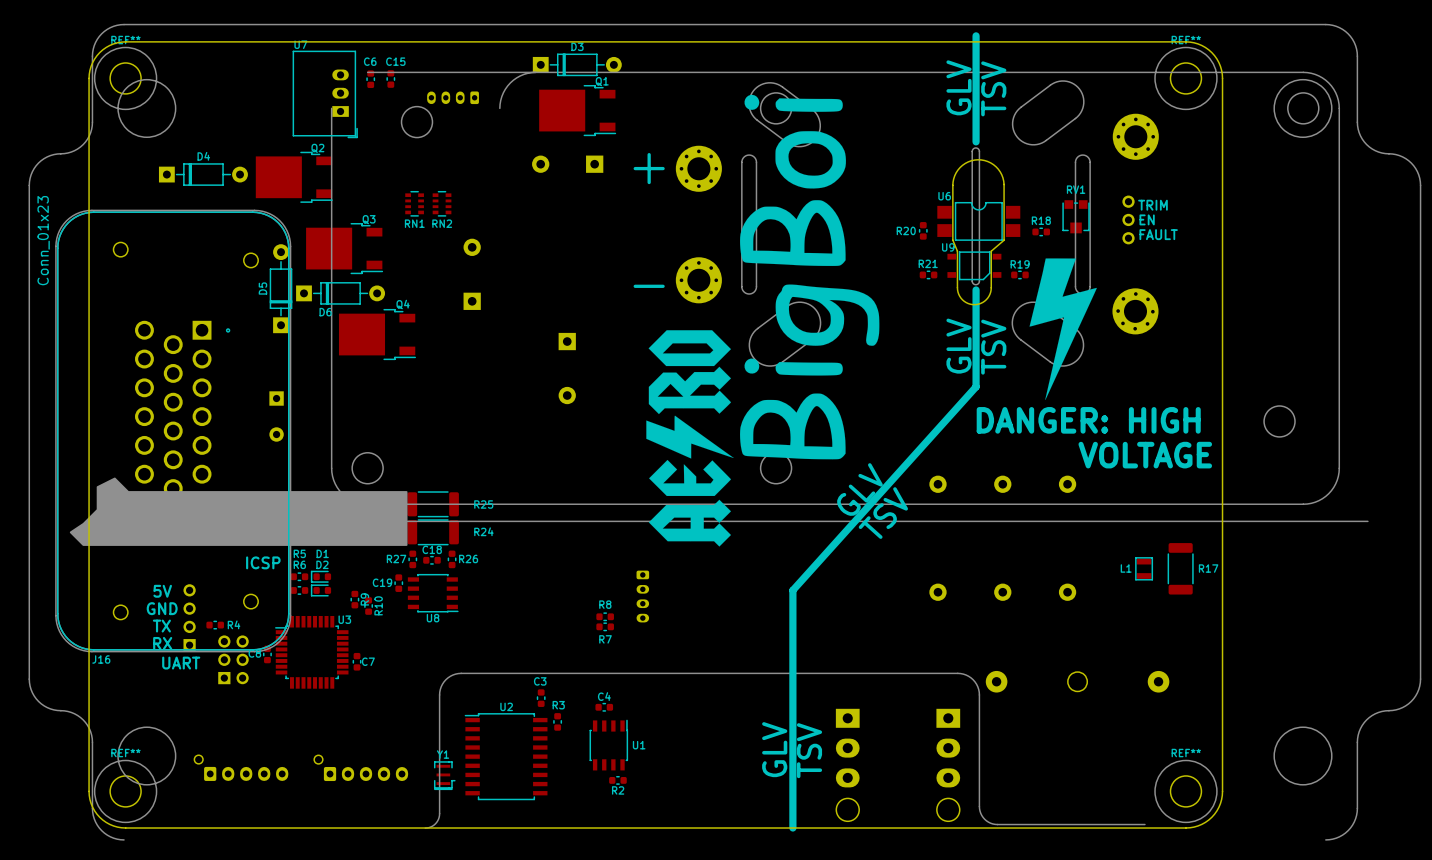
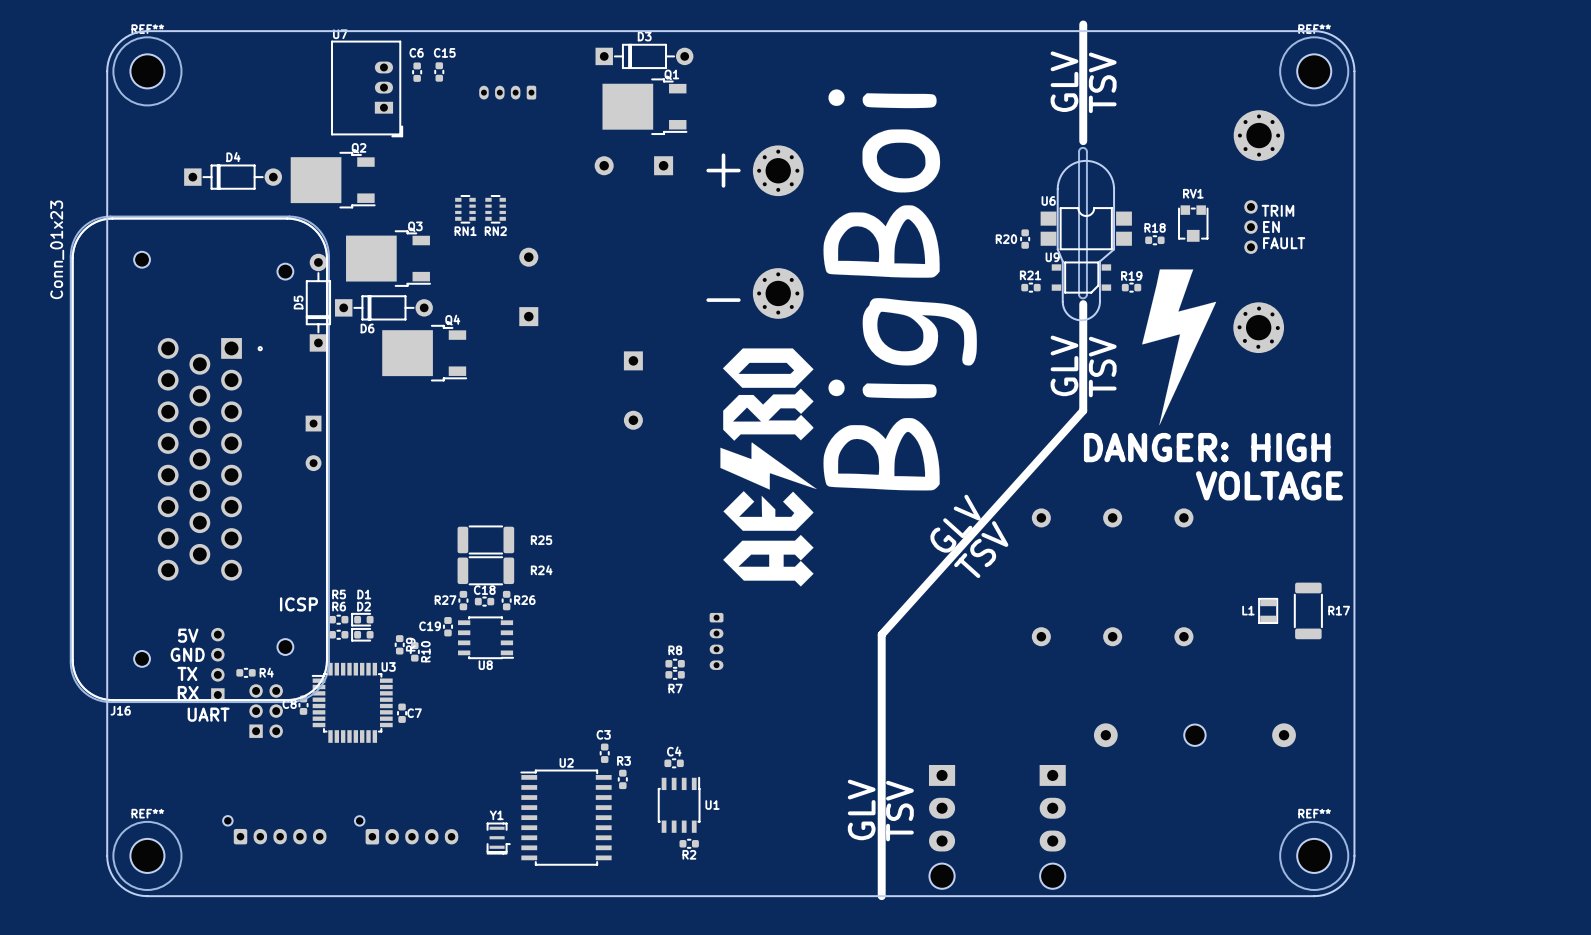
line: (367, 72) (1303, 72) (1318, 75) (1333, 89) (1339, 108) (1339, 468) (1335, 483) (1322, 498) (1303, 504) (367, 504) (355, 502) (339, 490) (331, 472) (331, 108) -> none
line: (535, 72) (523, 74) (510, 82) (501, 96) (499, 108) -> none
drawing: [117, 78, 177, 138] -> none
drawing: [1273, 78, 1333, 138] -> none
line: (1050, 85) (1020, 107) (1014, 115) (1012, 124) (1014, 132) (1024, 142) (1034, 144) (1044, 141) (1075, 118) (1081, 110) (1082, 95) (1076, 85) (1064, 81) (1050, 85) -> none
line: (782, 87) (811, 109) (818, 116) (820, 126) (818, 134) (808, 144) (798, 146) (788, 143) (757, 120) (751, 112) (749, 100) (756, 87) (768, 82) (782, 87) -> none
drawing: [759, 92, 793, 125] -> none
drawing: [400, 105, 434, 139] -> none
line: (741, 162) (741, 286) (743, 291) (749, 294) (754, 291) (756, 286) (756, 162) (754, 157) (749, 155) (743, 157) (741, 162) -> none
line: (1075, 162) (1075, 286) (1077, 291) (1082, 294) (1087, 291) (1090, 286) (1090, 162) (1087, 157) (1082, 155) (1077, 157) (1075, 162) -> none
line: (812, 339) (820, 327) (818, 314) (810, 305) (796, 302) (786, 306) (755, 330) (750, 338) (749, 348) (757, 361) (763, 365) (773, 365) (780, 363) (812, 339) -> none
line: (1020, 339) (1012, 327) (1014, 314) (1022, 305) (1036, 302) (1045, 306) (1077, 330) (1082, 338) (1083, 348) (1075, 361) (1069, 365) (1059, 365) (1051, 363) (1020, 339) -> none
drawing: [1263, 405, 1296, 438] -> none
drawing: [69, 452, 408, 546] -> none
drawing: [759, 452, 793, 485] -> none
line: (166, 521) (1367, 521) -> none
drawing: [117, 726, 177, 786] -> none
drawing: [1273, 726, 1333, 786] -> none
line: (1144, 824) (997, 824) (986, 820) (981, 815) (979, 806) (979, 692) (974, 681) (963, 674) (461, 673) (448, 677) (440, 689) (439, 815) (435, 823) (425, 828) -> none
line: (124, 839) (113, 838) (104, 833) (94, 818) (92, 808) (92, 738) (87, 725) (74, 713) (50, 708) (41, 703) (32, 692) (29, 679) (29, 181) (32, 171) (41, 160) (50, 155) (74, 150) (87, 139) (92, 125) (92, 56) (94, 45) (104, 31) (113, 26) (124, 24) (1325, 24) (1342, 29) (1352, 39) (1357, 52) (1357, 122) (1360, 135) (1366, 144) (1375, 150) (1399, 155) (1408, 160) (1415, 168) (1420, 181) (1420, 679) (1417, 692) (1408, 703) (1399, 708) (1375, 713) (1362, 725) (1357, 738) (1357, 808) (1355, 818) (1350, 828) (1342, 835) (1325, 839) -> none

